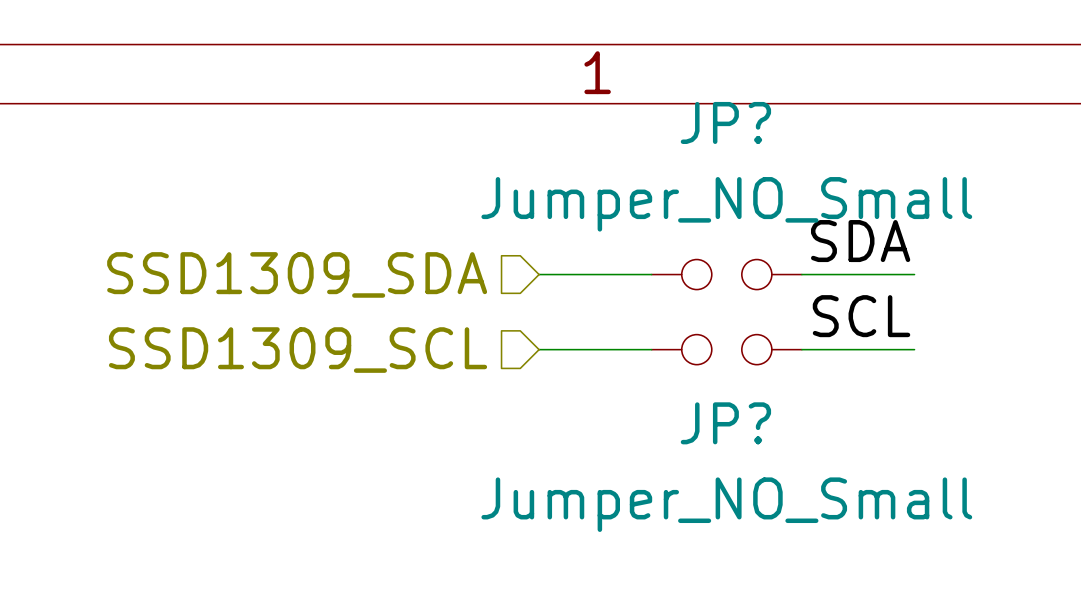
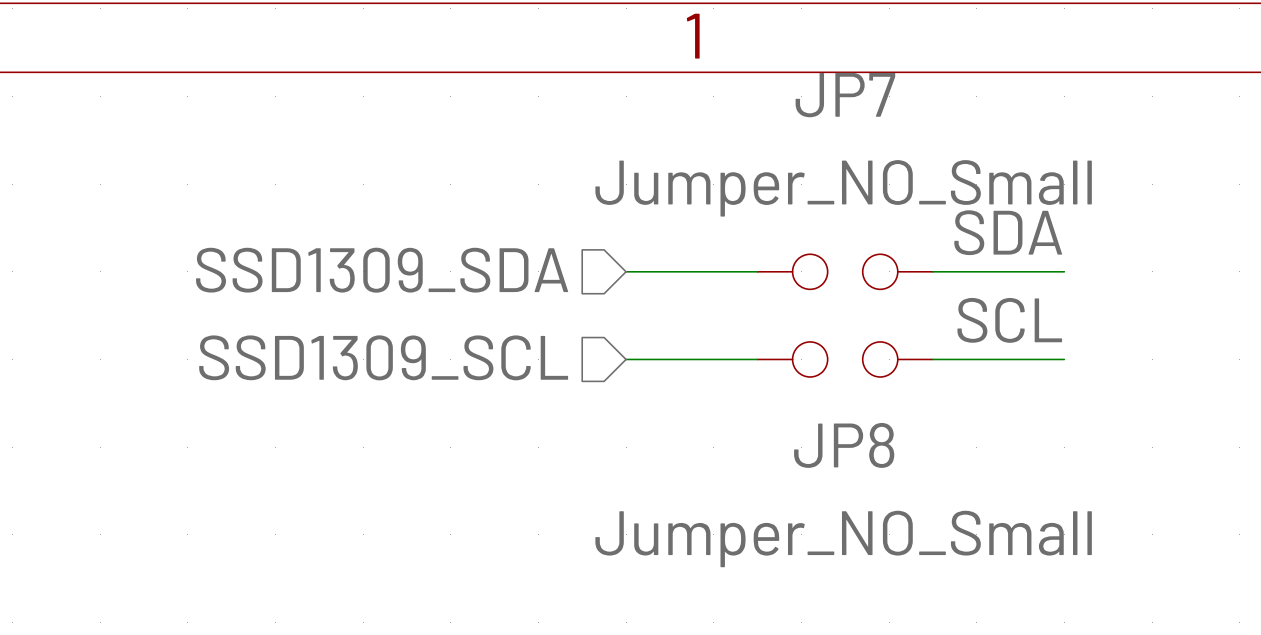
JP? name: JP? (725, 122) -> JP7 (845, 95)
JP? name: JP? (725, 423) -> JP8 (844, 445)

